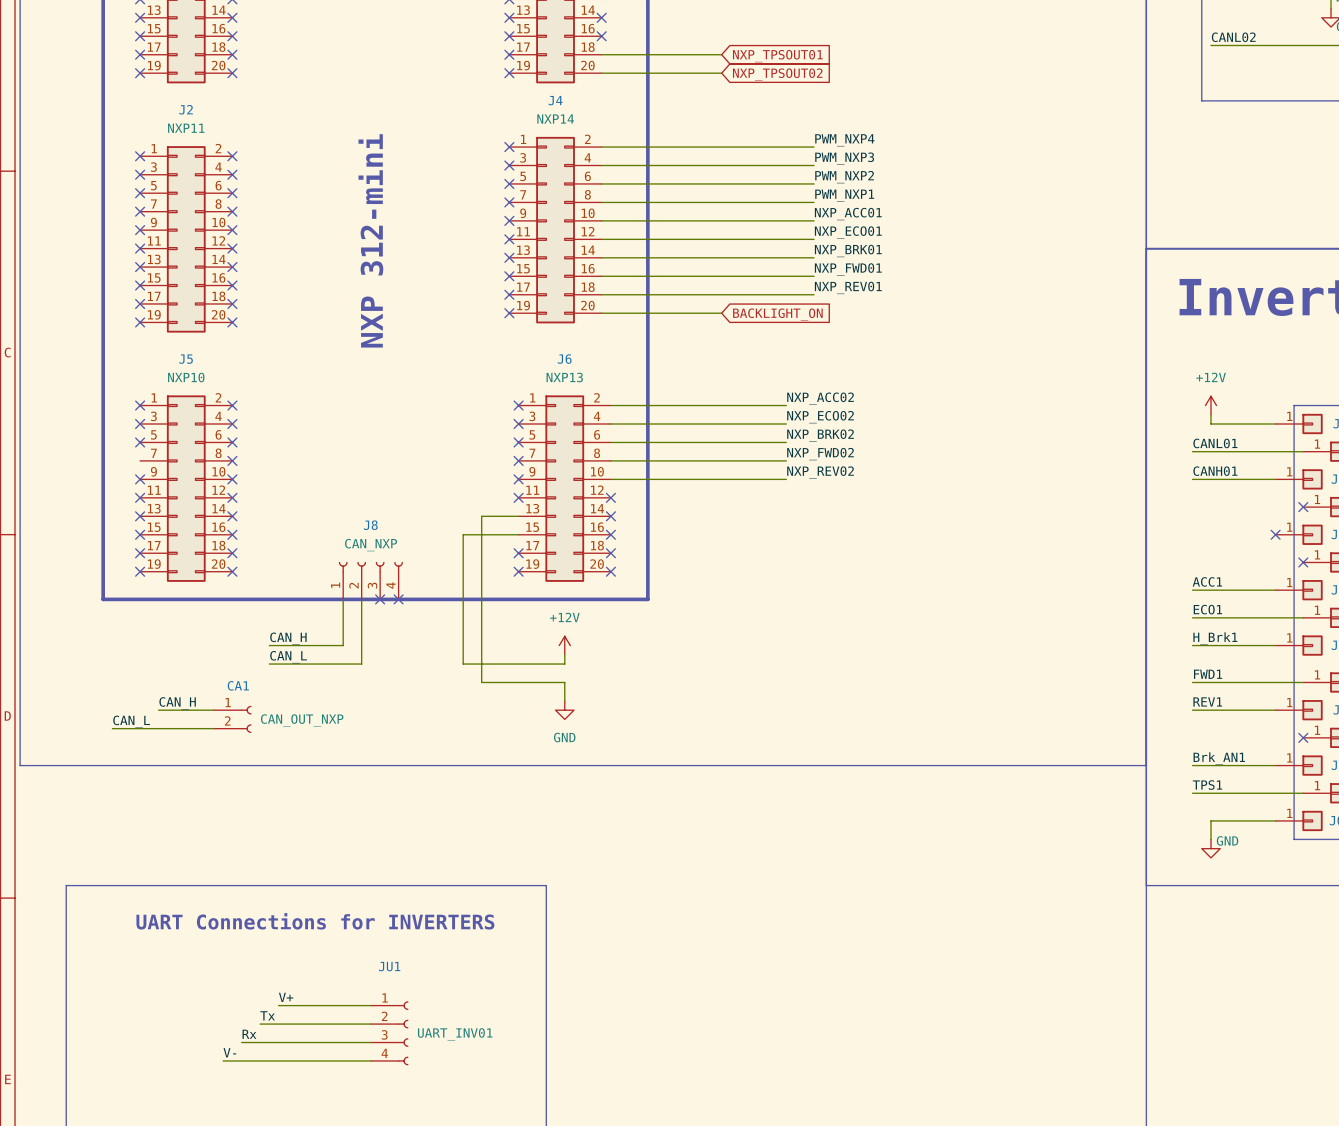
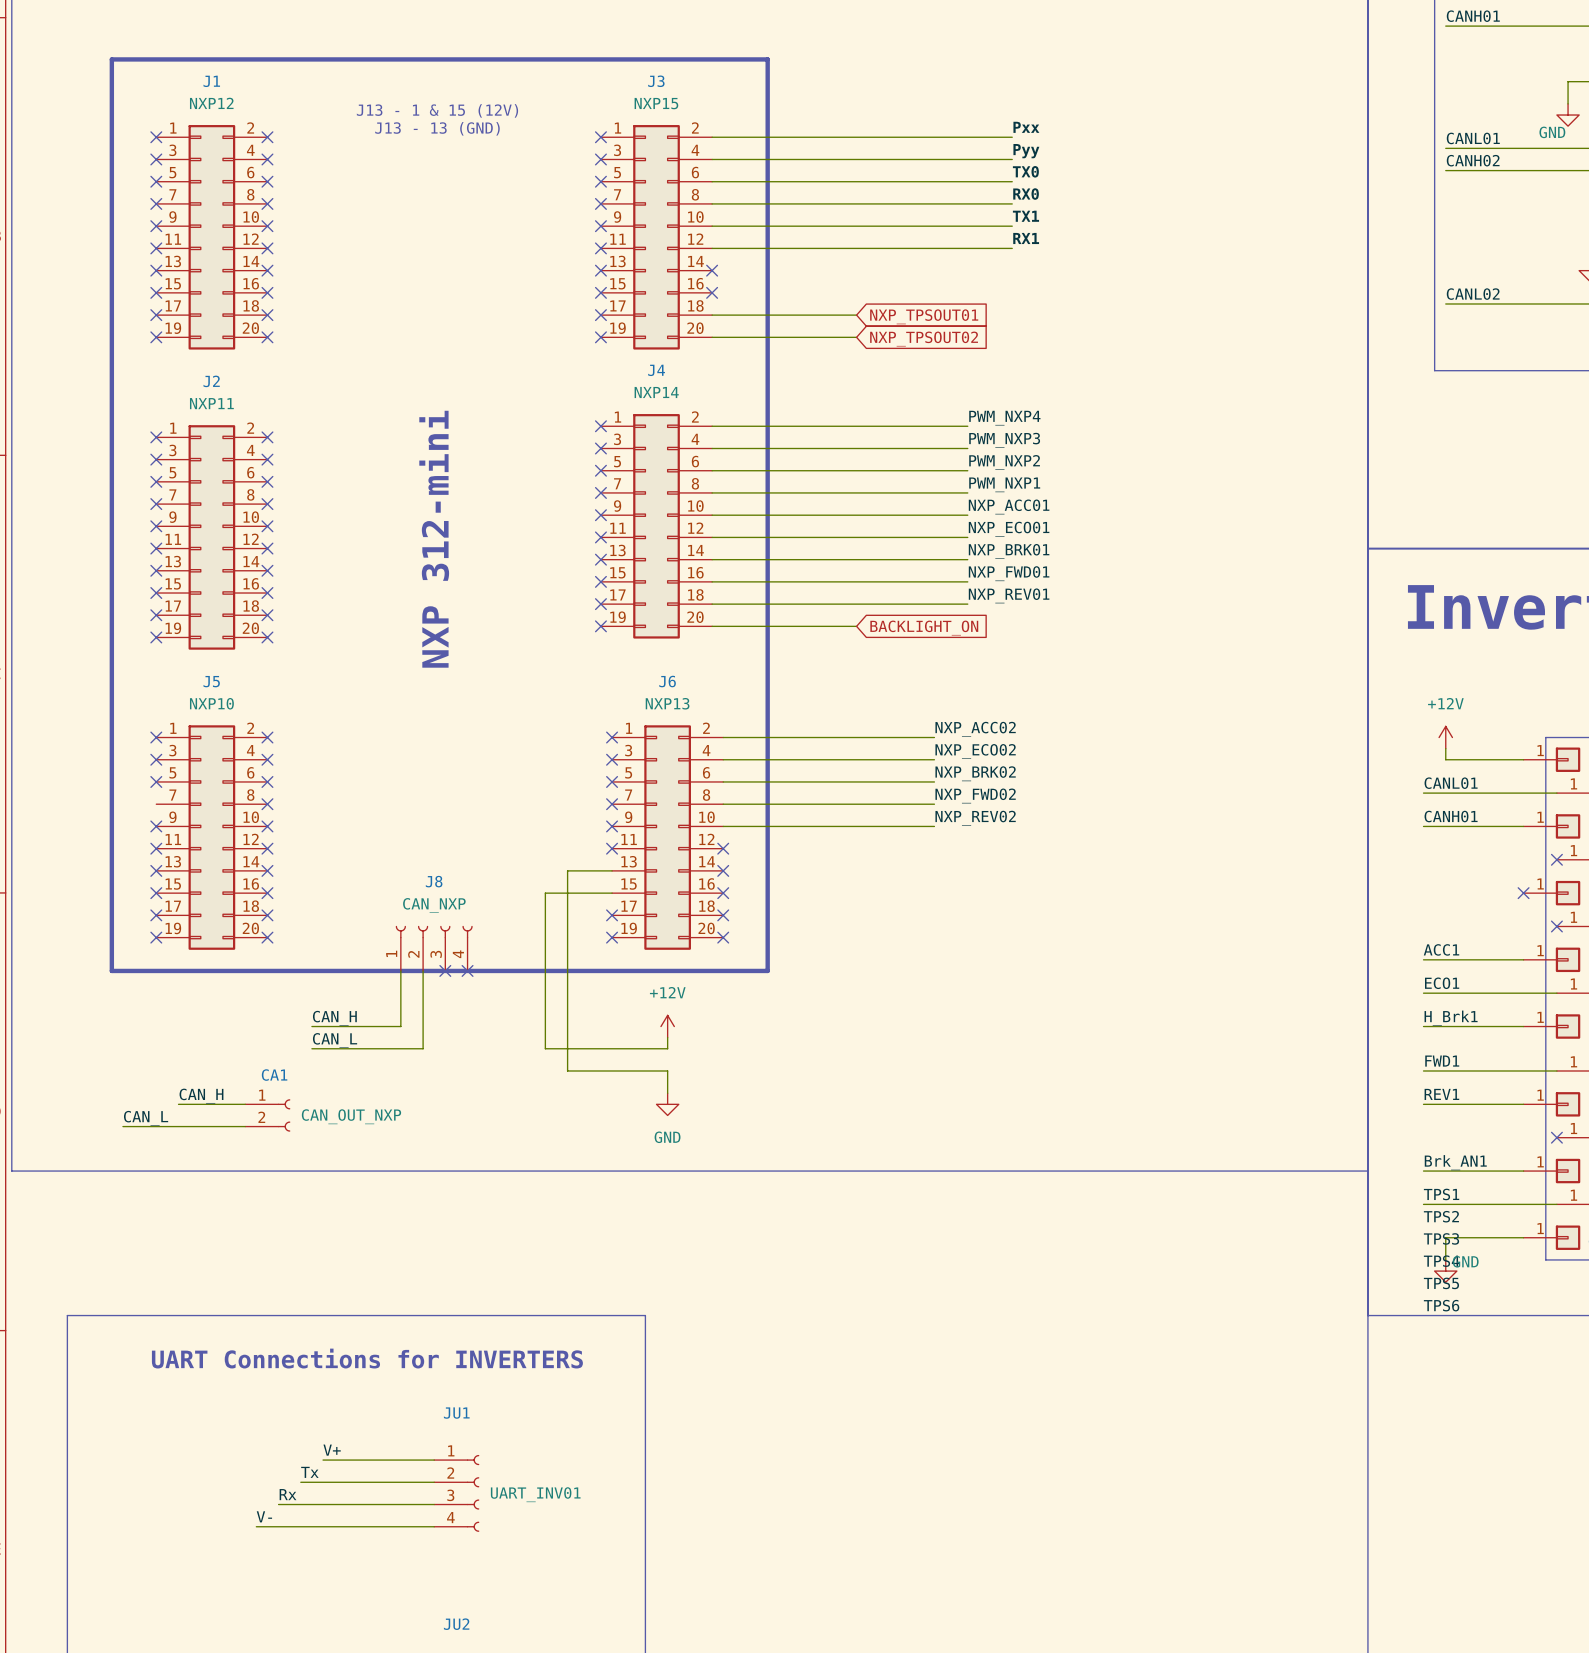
label: none -> TPS2 (1441, 1216)
label: none -> TPS3 (1441, 1238)
label: none -> TPS4 (1441, 1261)
label: none -> TPS5 (1441, 1283)
label: none -> TPS6 (1441, 1305)

